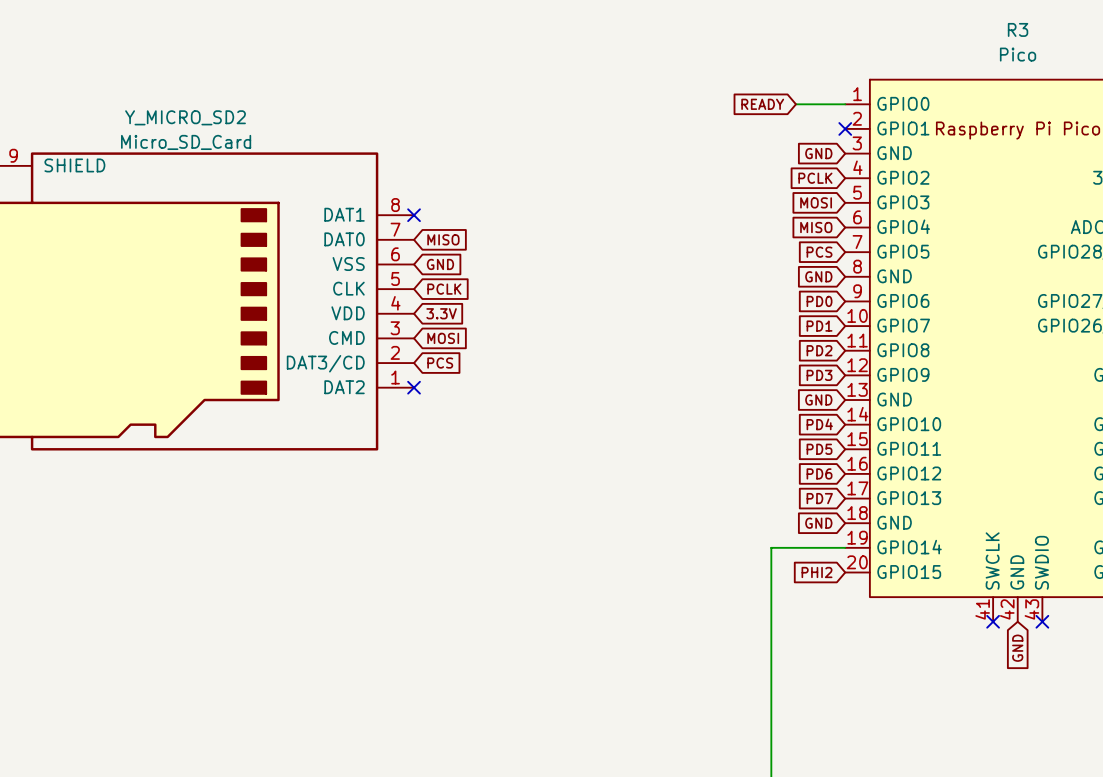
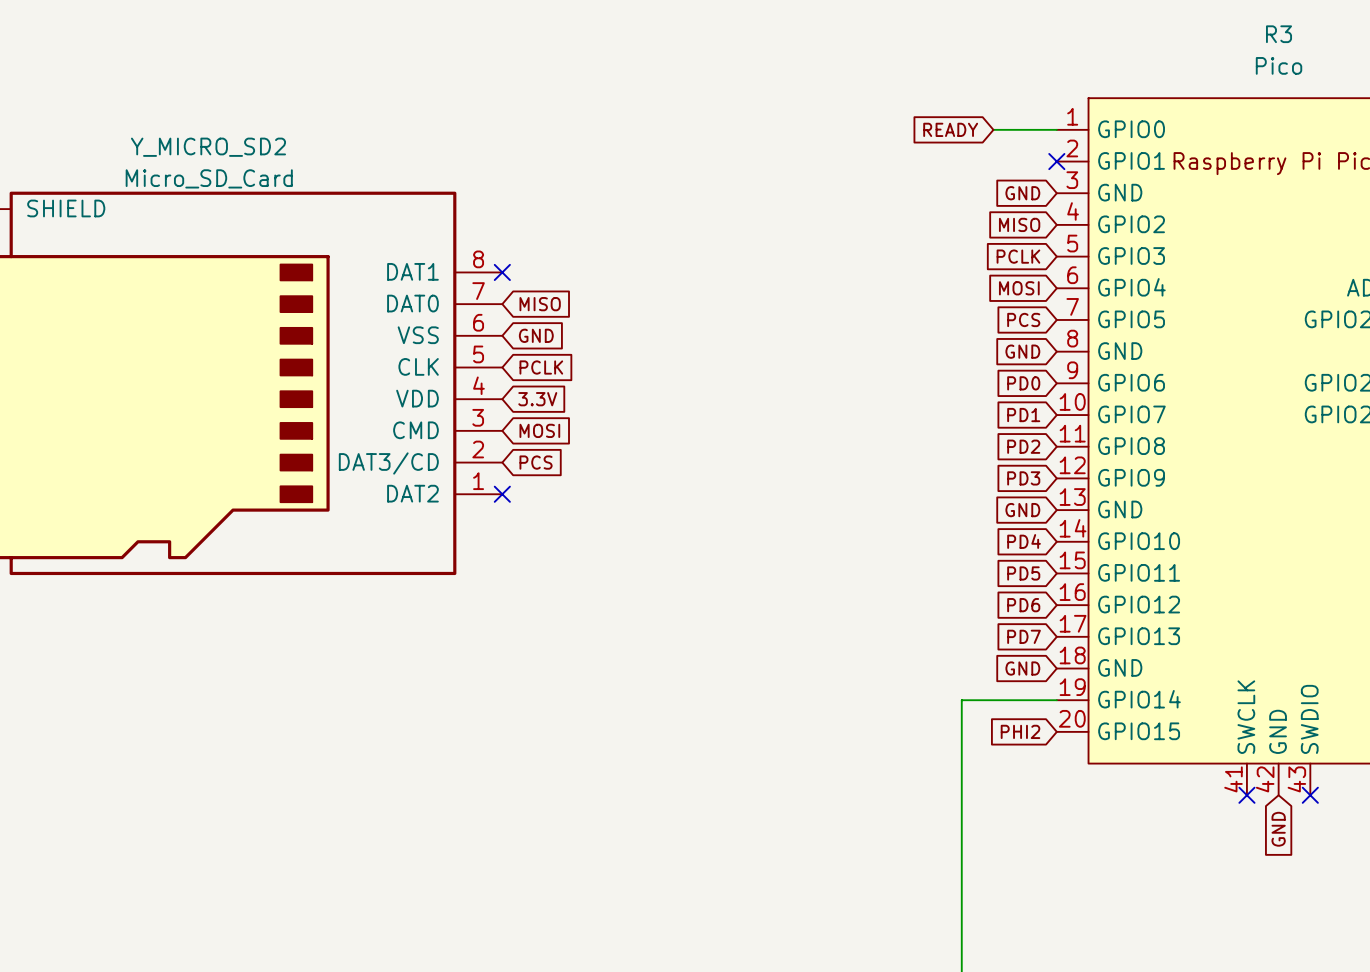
global label: PCLK (815, 178) -> MISO (1019, 224)
global label: MOSI (816, 202) -> PCLK (1018, 256)
global label: MISO (816, 227) -> MOSI (1019, 288)

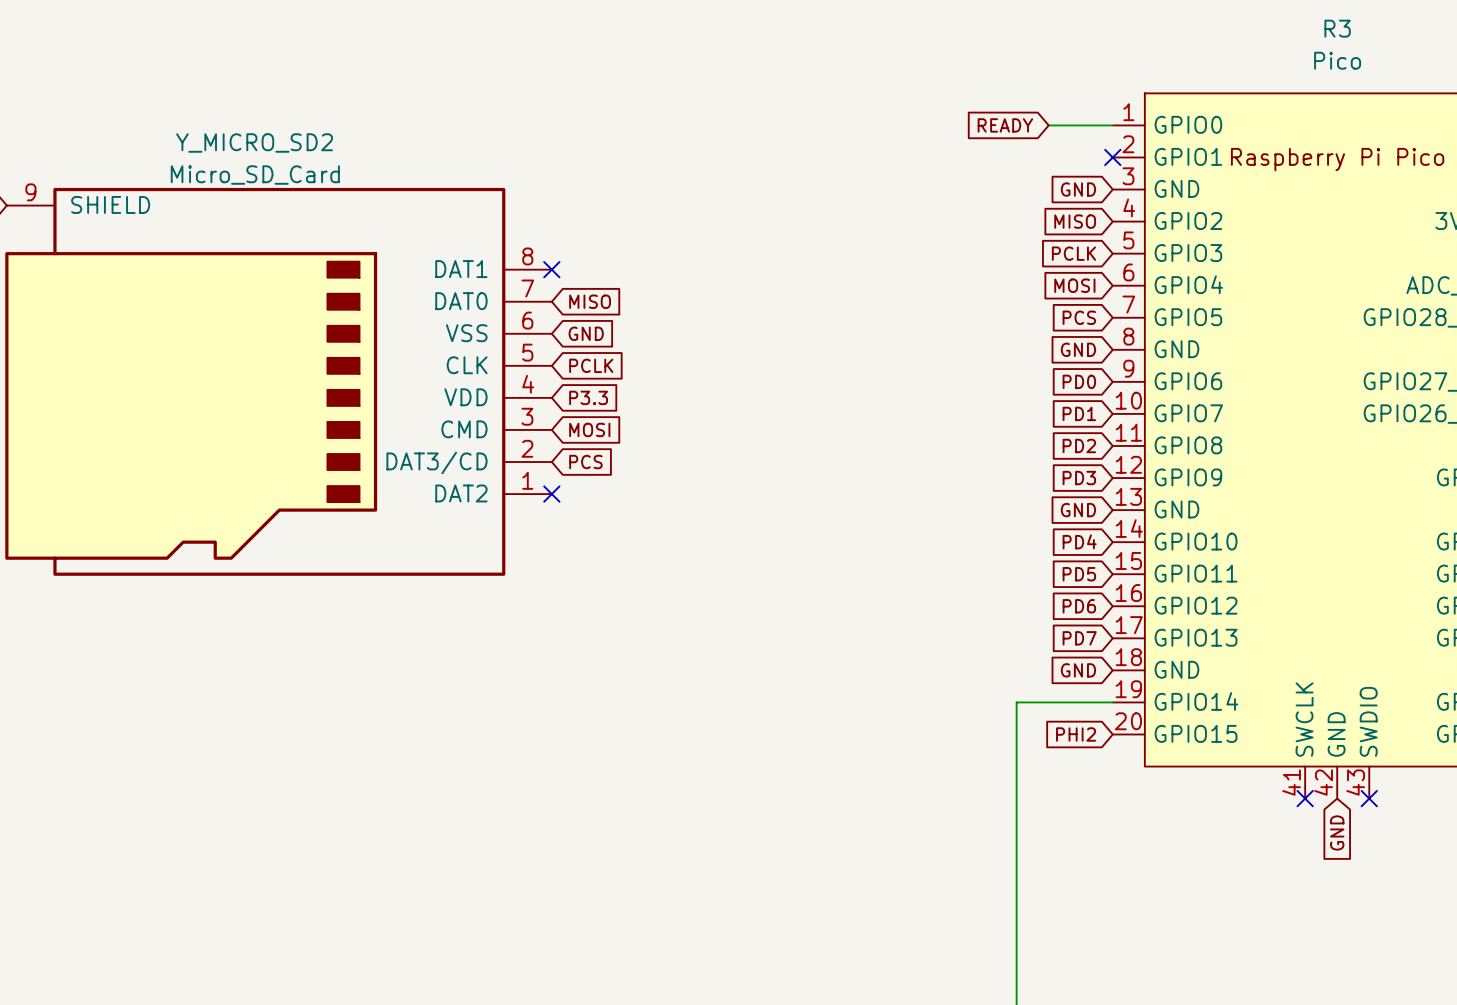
global label: 3.3V (537, 399) -> P3.3 (588, 397)

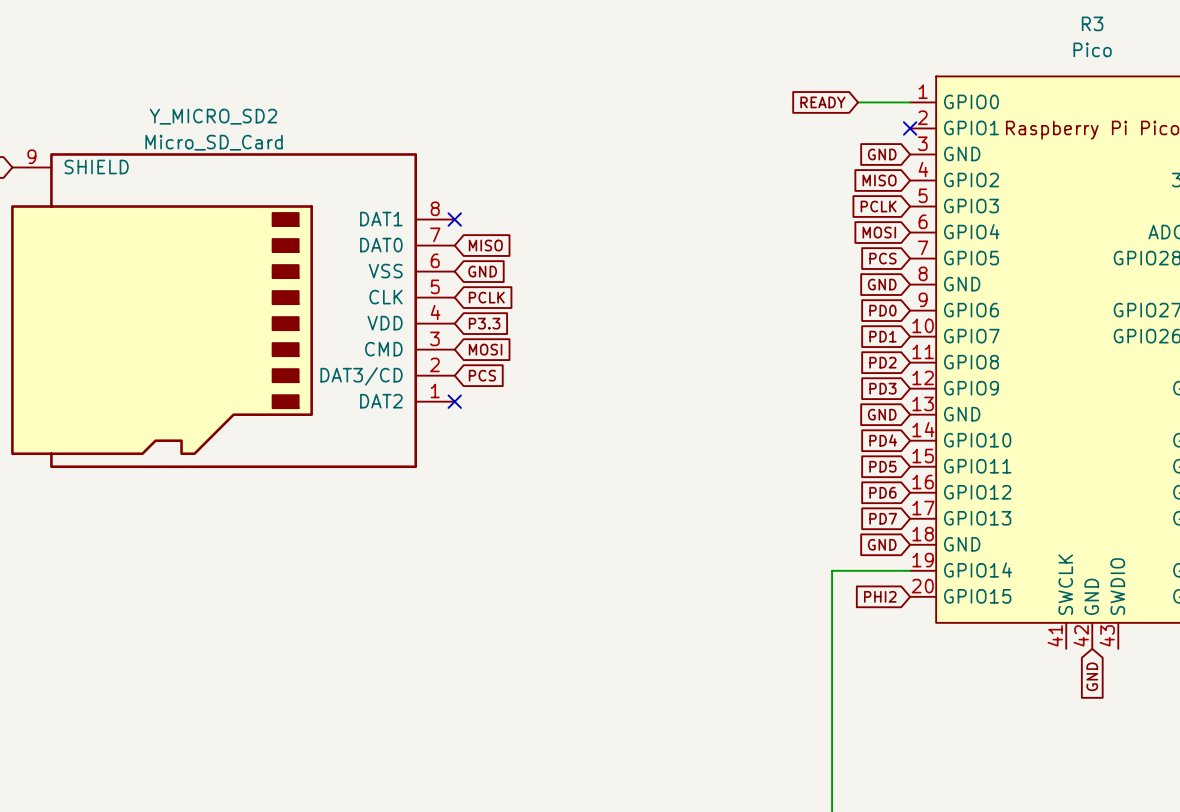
no-connect mark: (1305, 798) -> none
no-connect mark: (1369, 798) -> none

